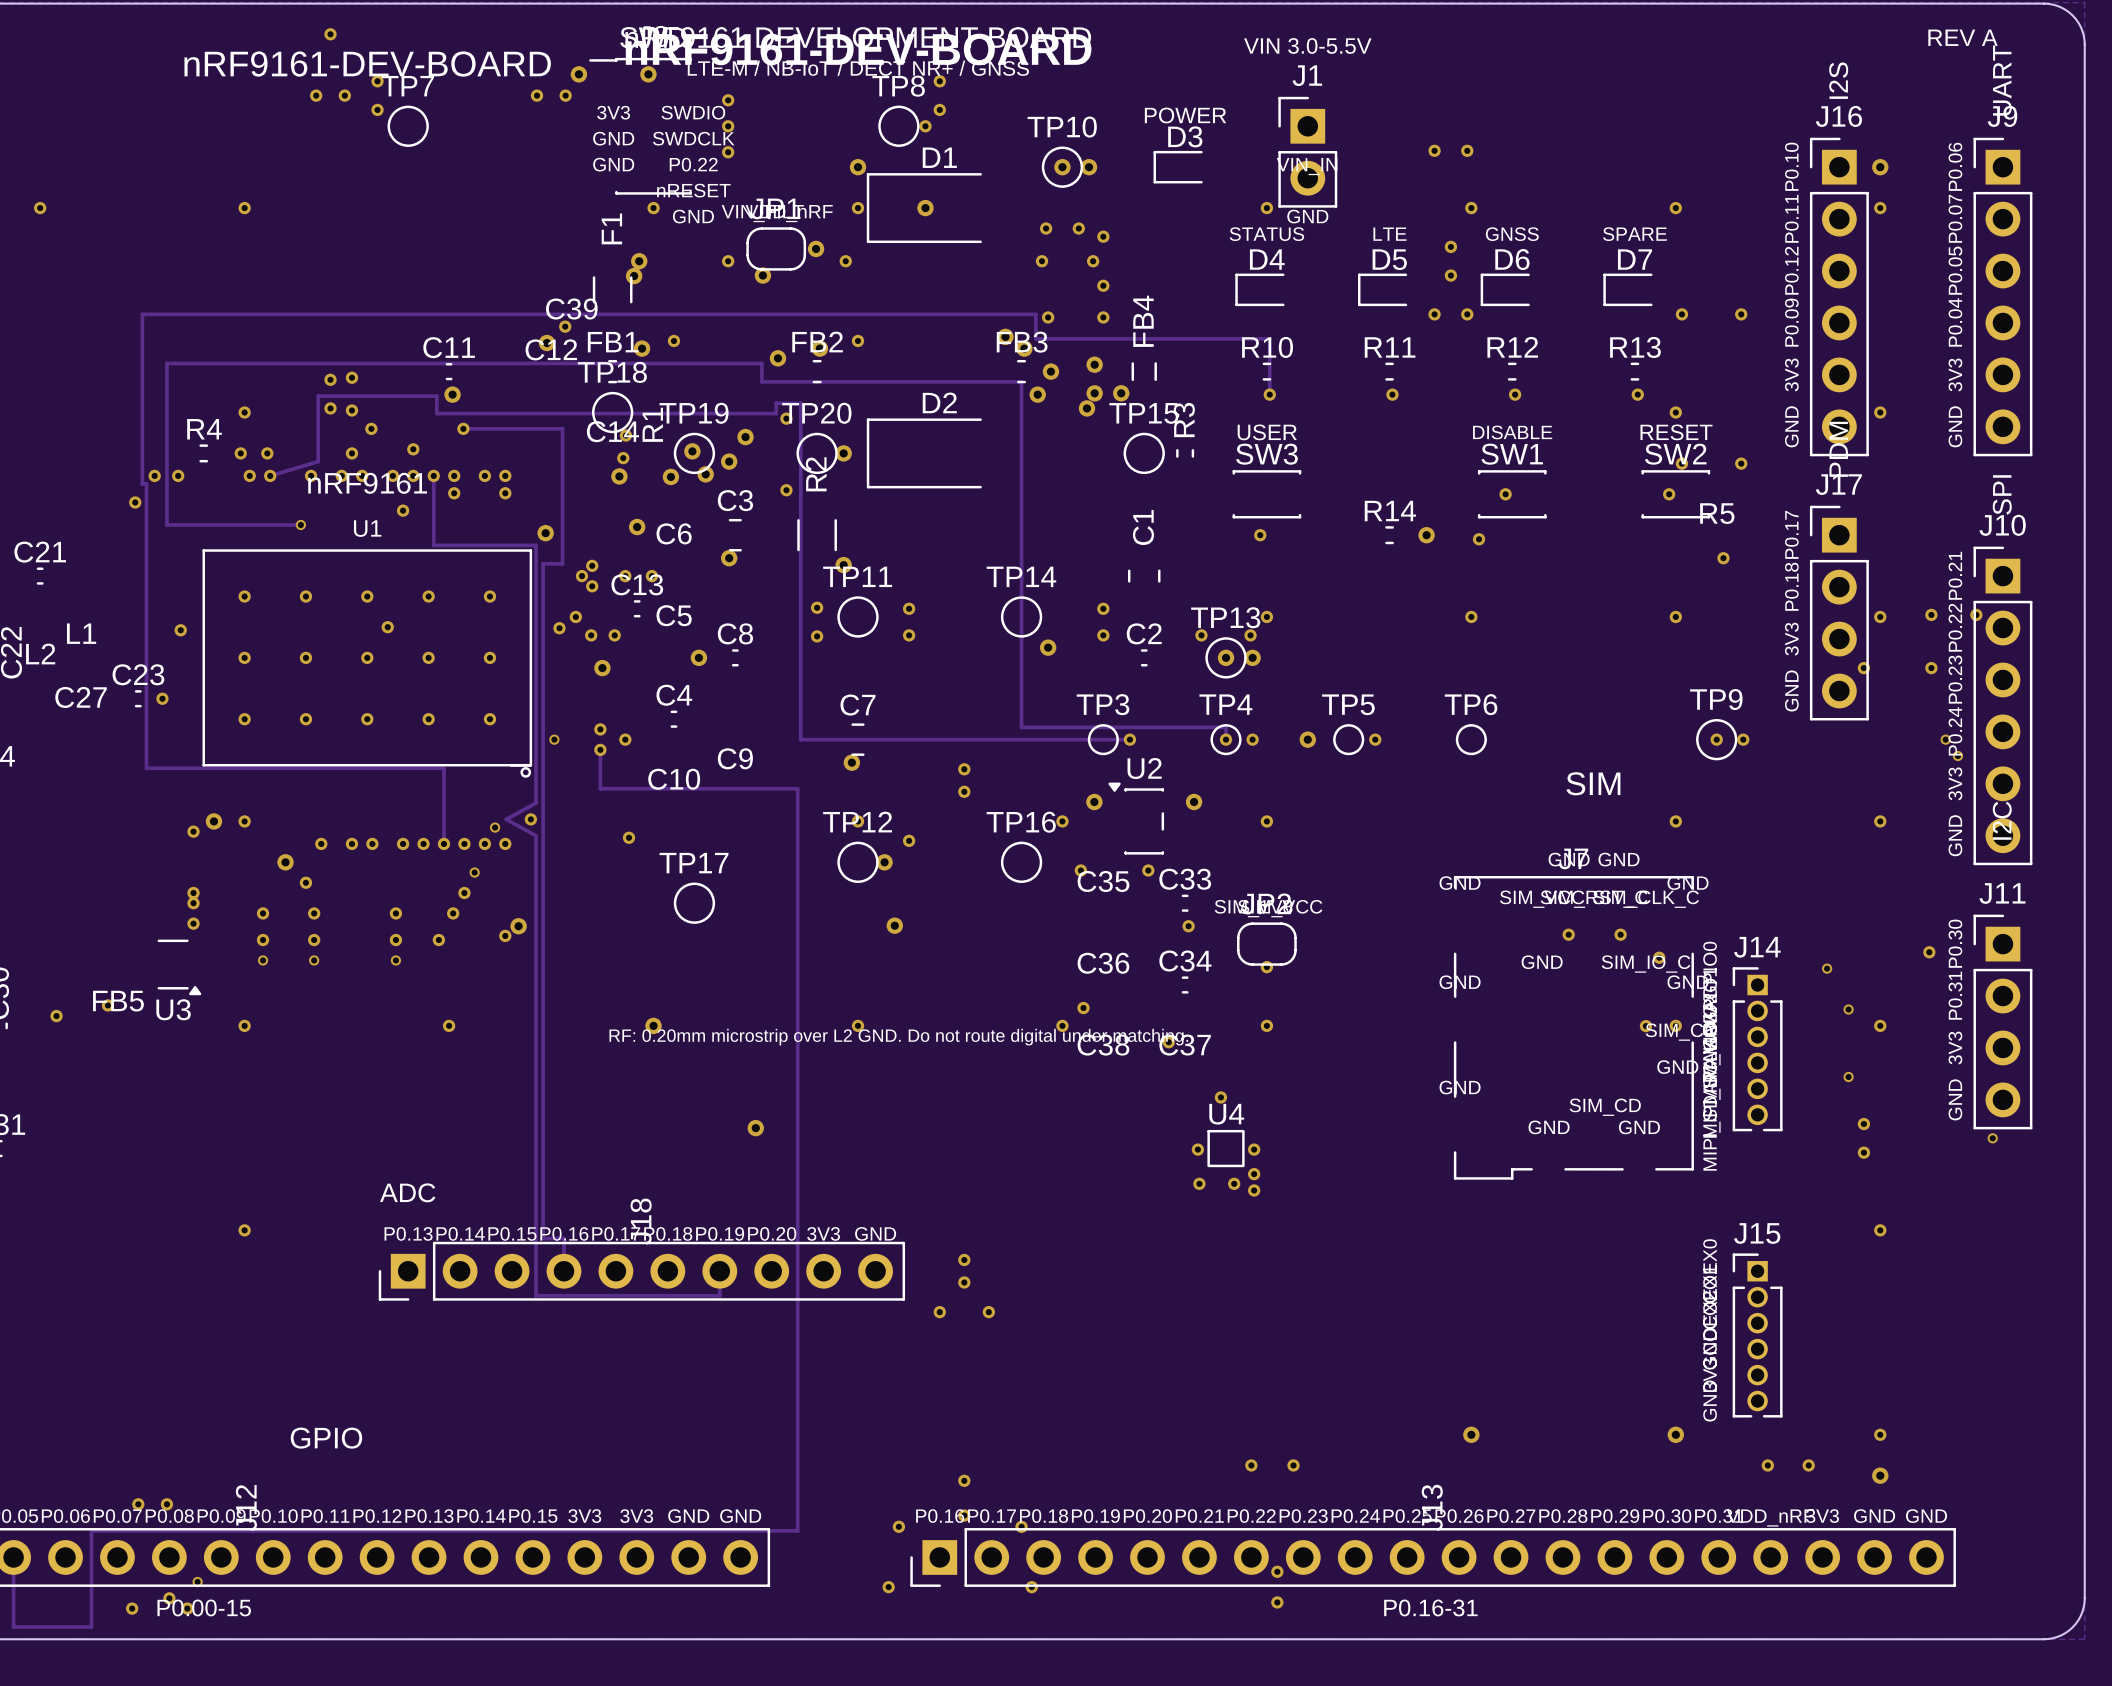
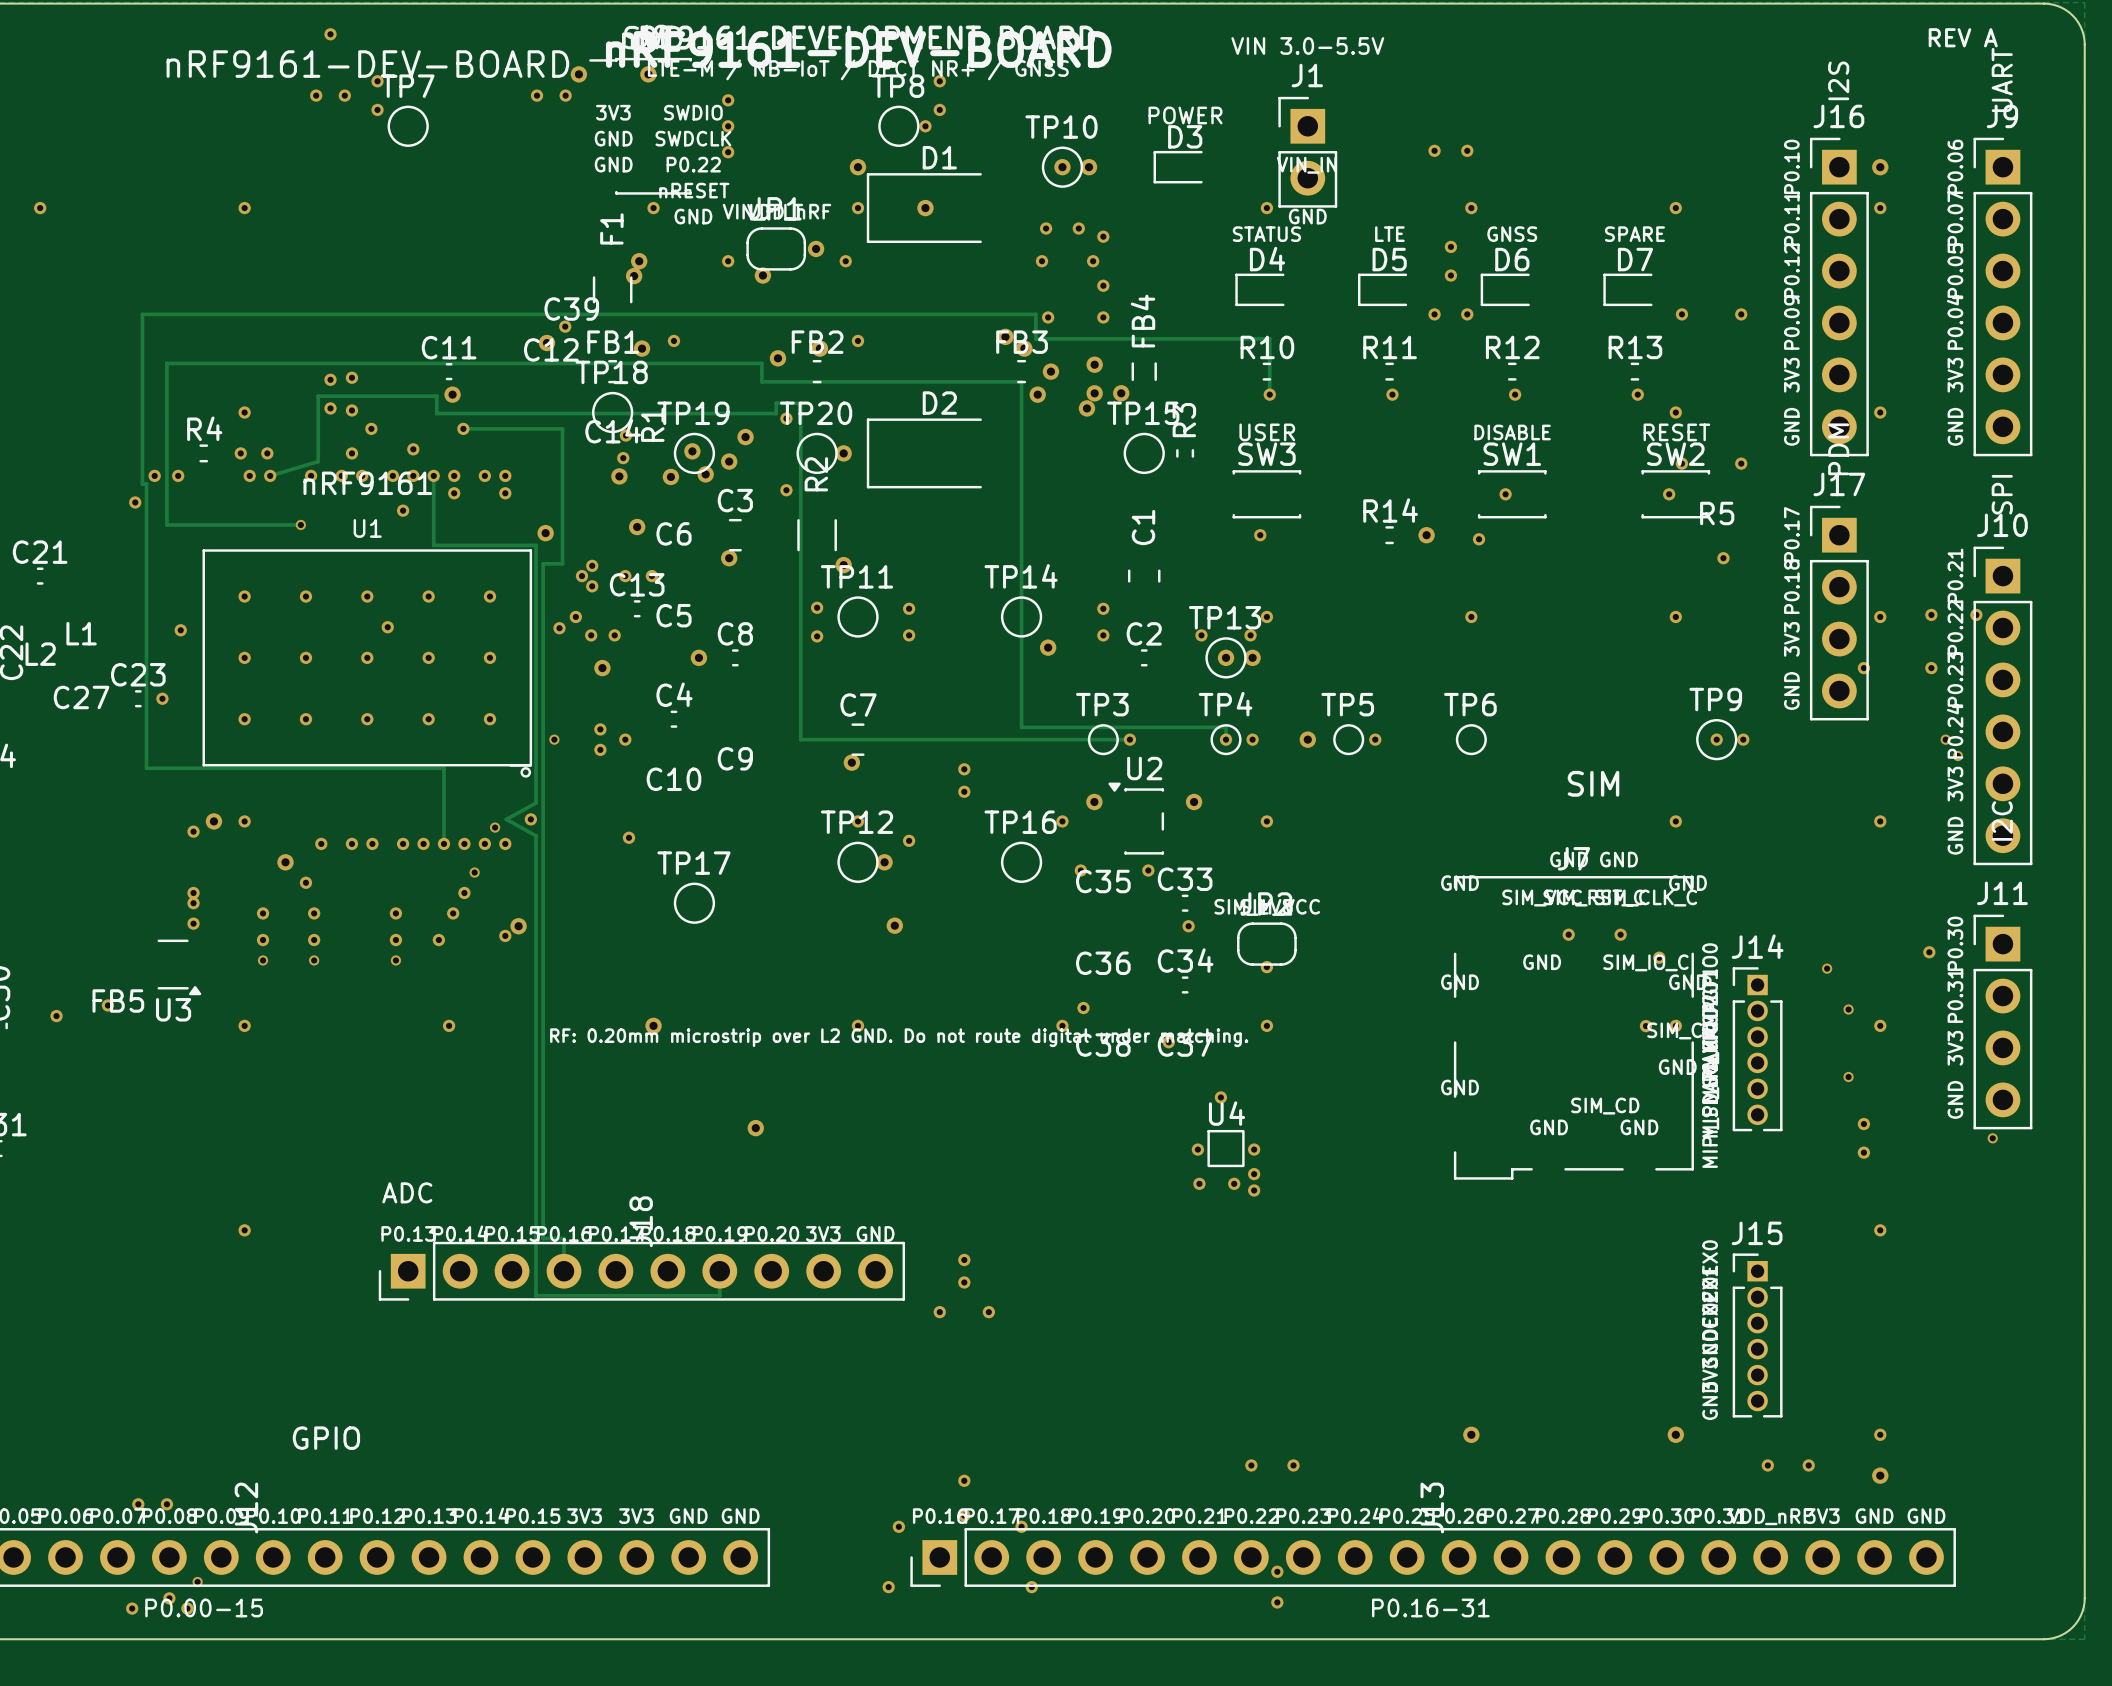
track: (600, 749) (600, 788) (797, 788) (797, 1530) (91, 1530) (91, 1626) (13, 1626) (13, 1557) -> none

